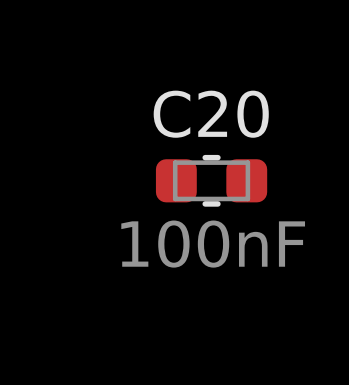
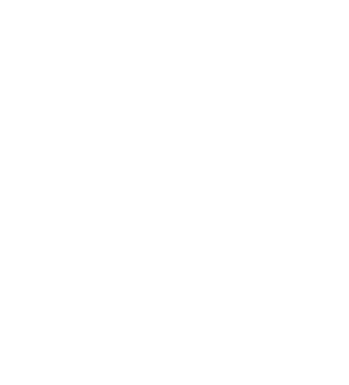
C20: 100nF (211, 180) -> none

